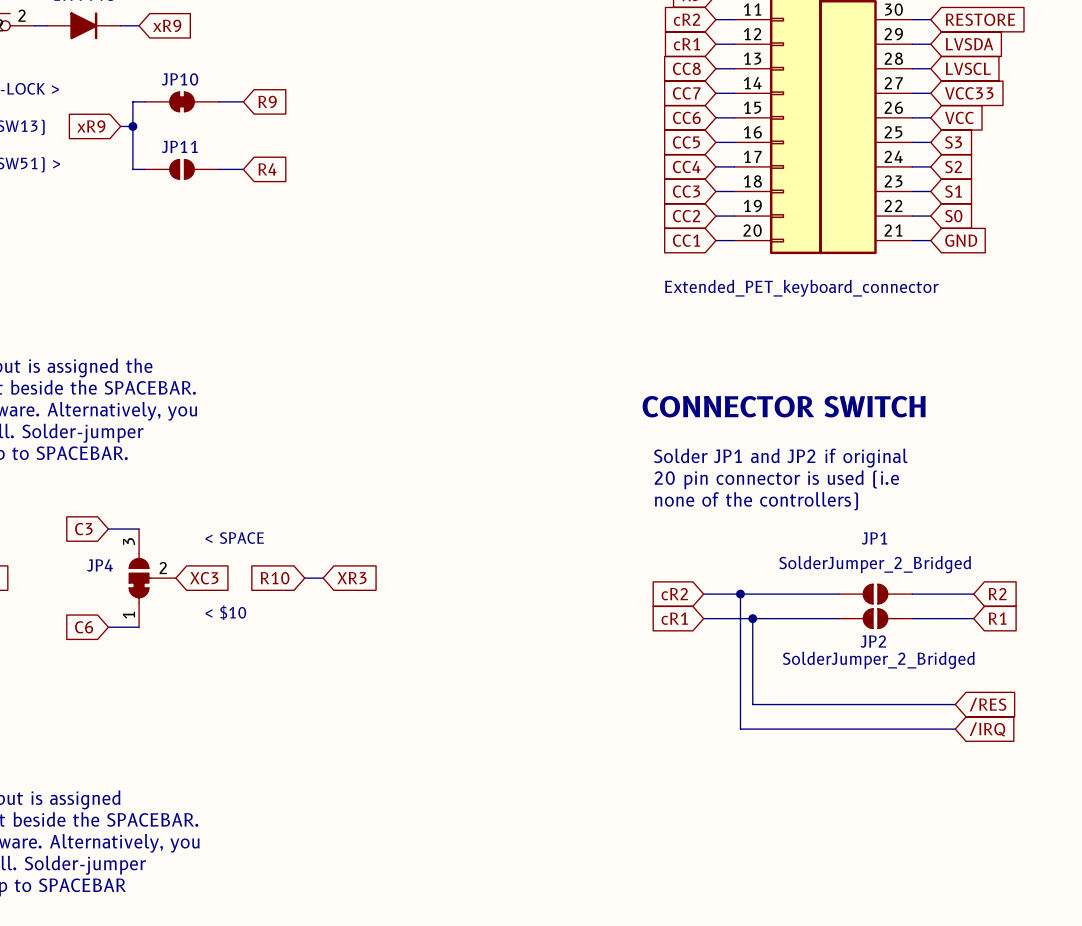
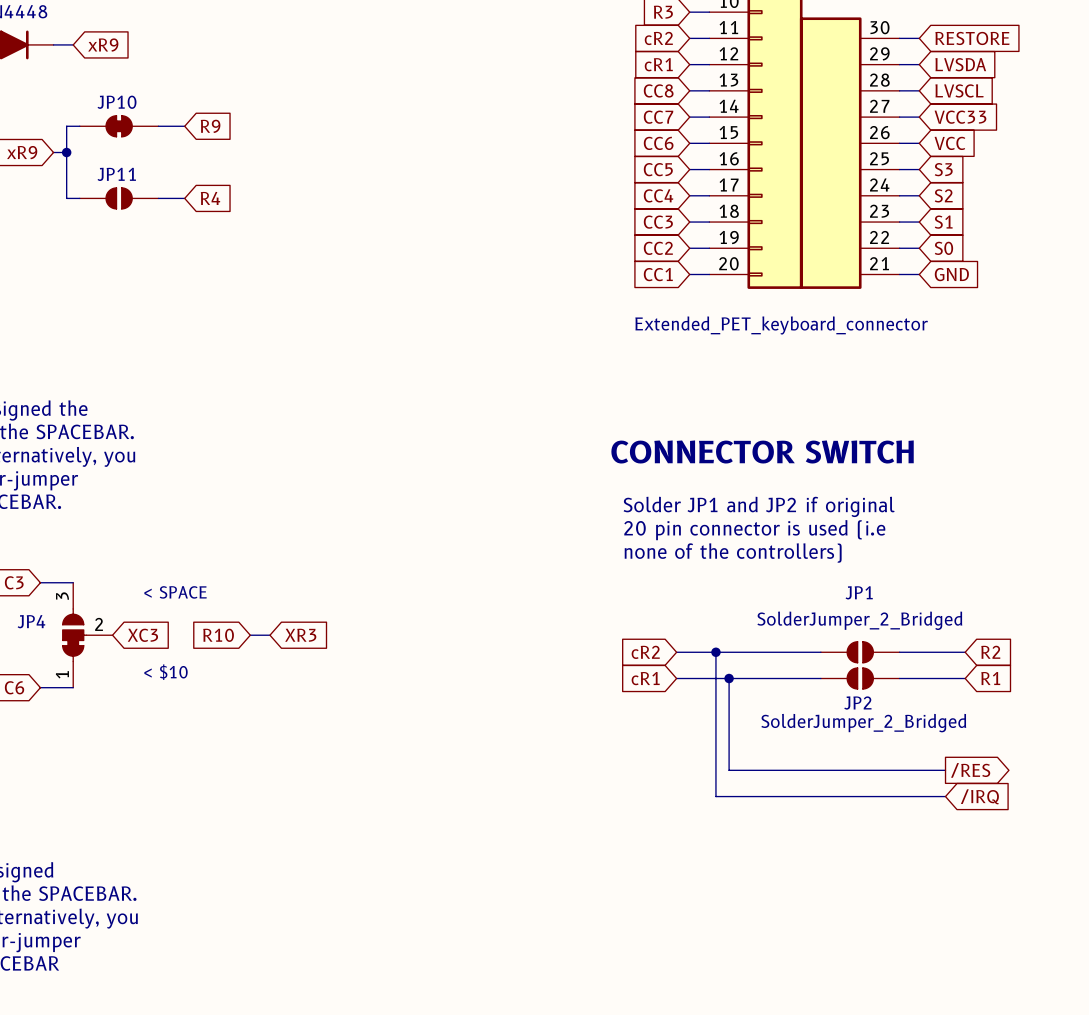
global label shape: input (988, 704) -> output (970, 770)

